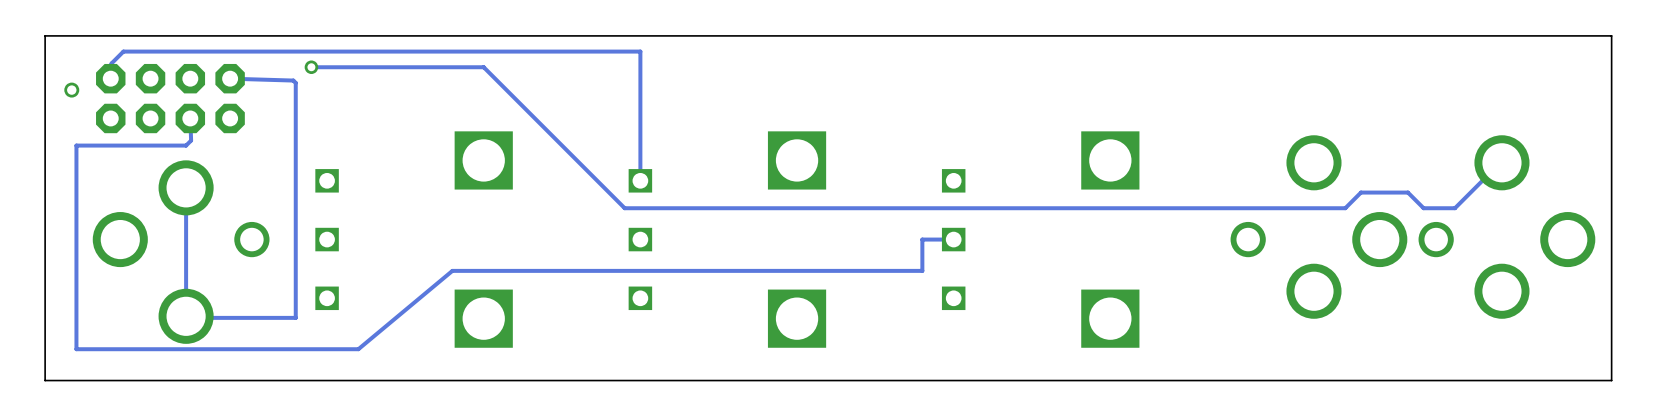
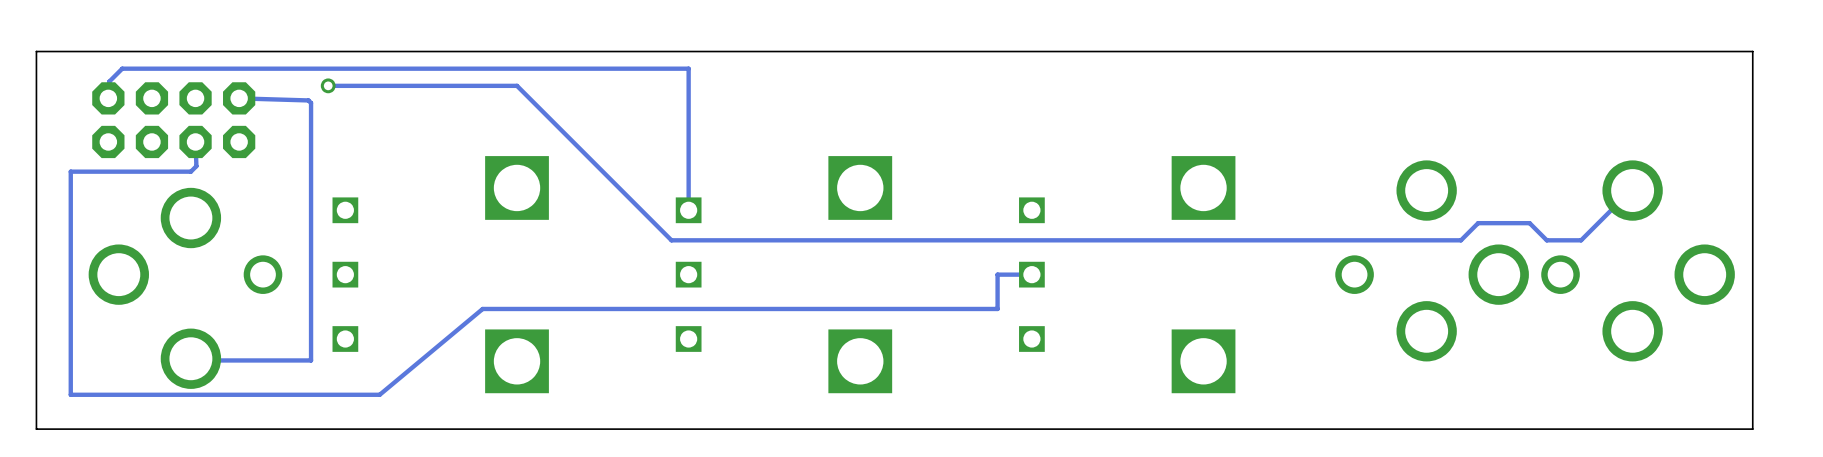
via: (71, 90) -> none
track: (186, 187) (186, 316) -> none

